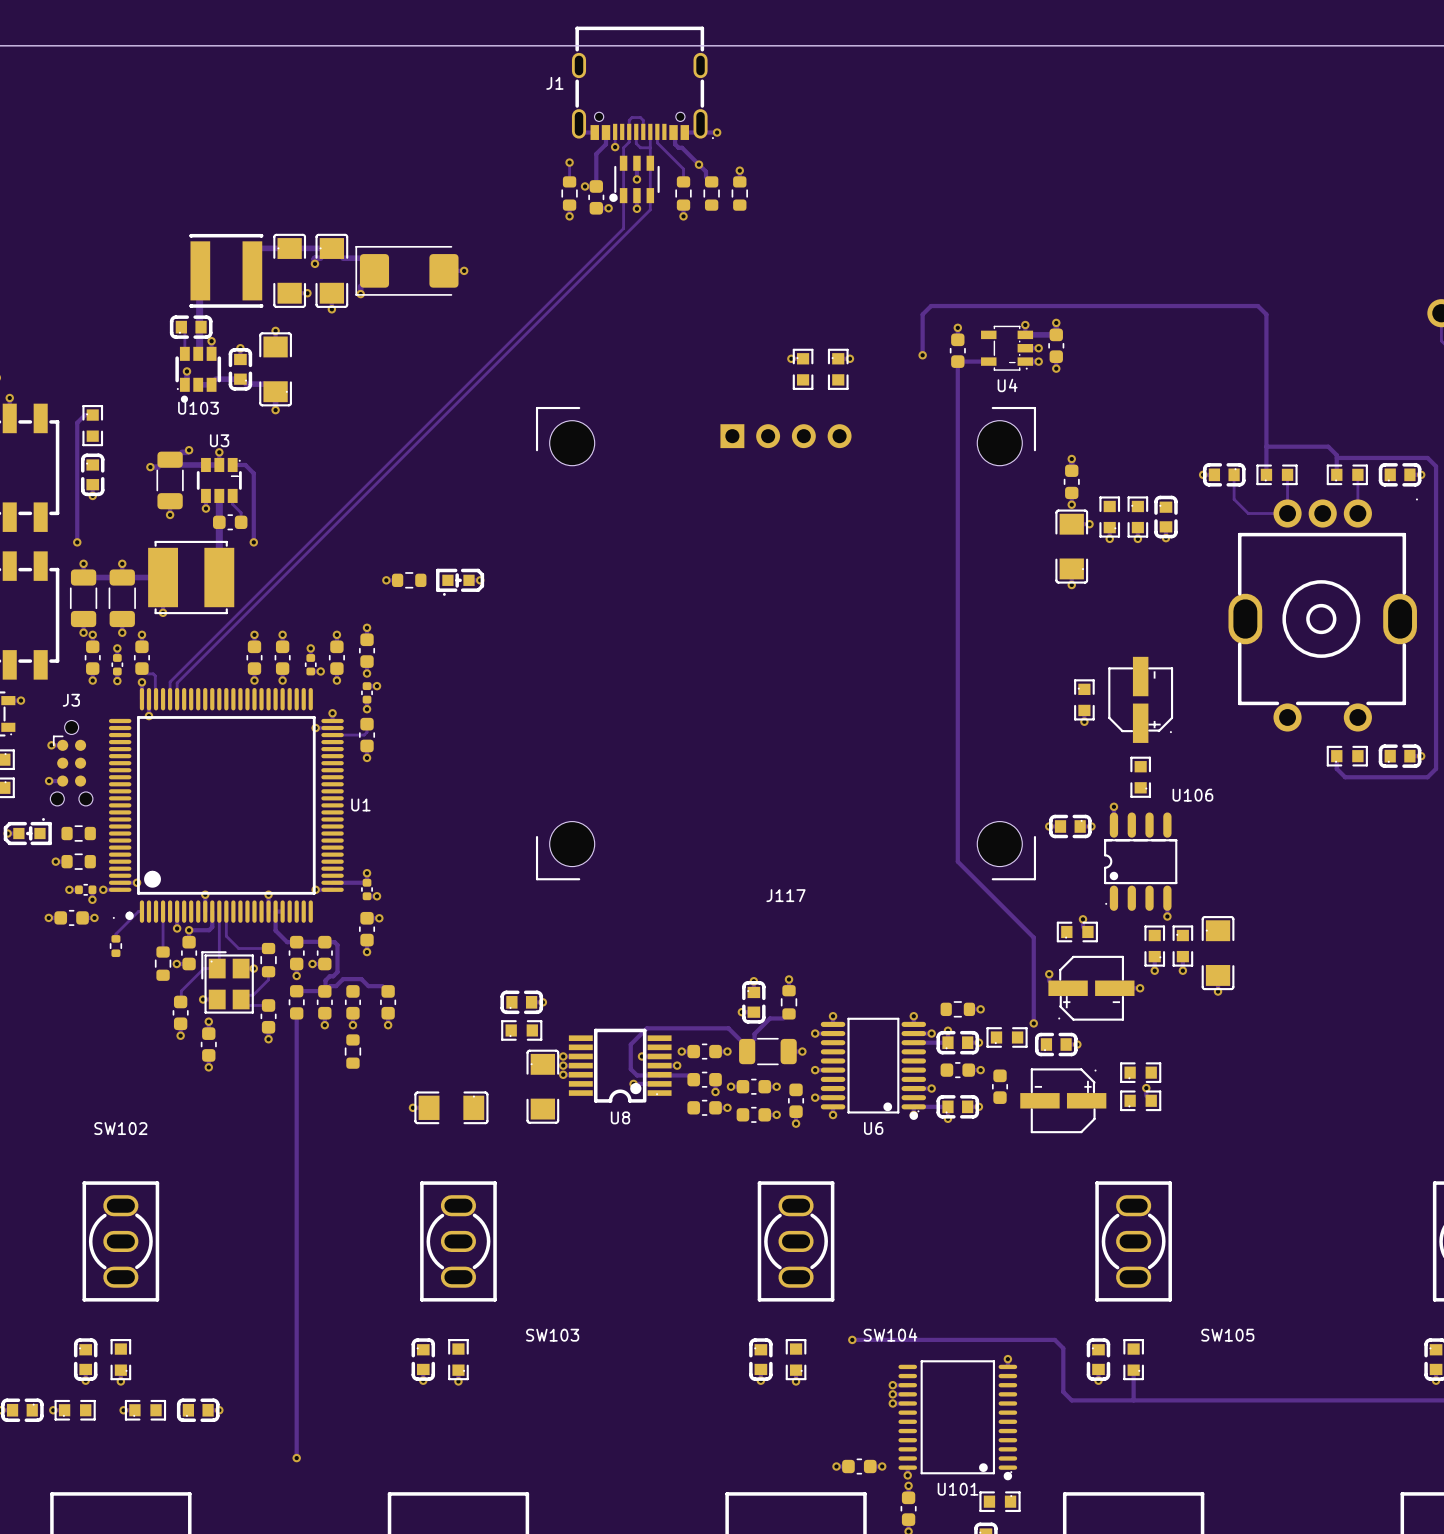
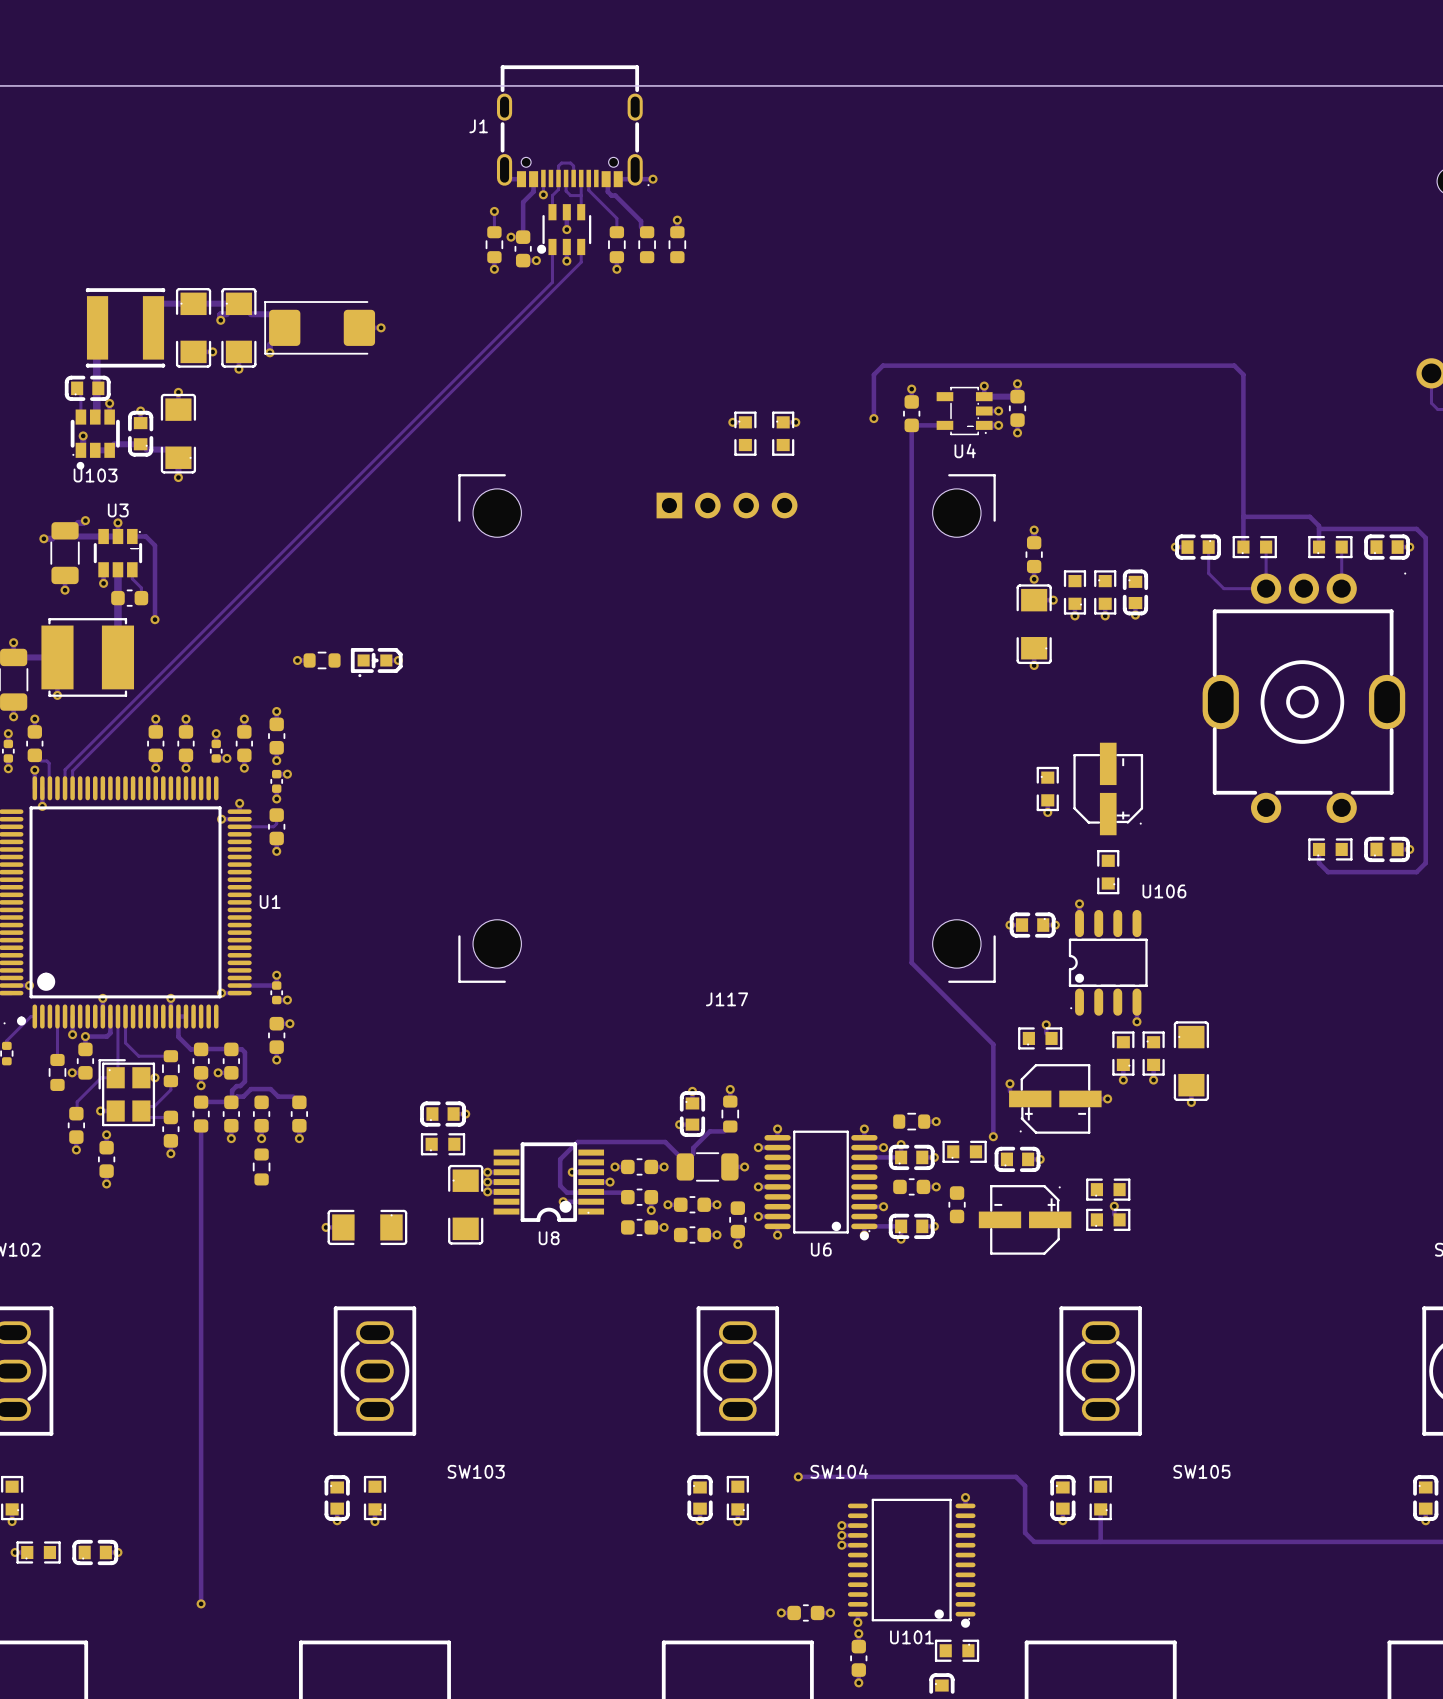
track: (623, 163) (623, 195) -> none
track: (650, 163) (650, 195) -> none
via: (698, 164) -> none

